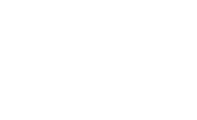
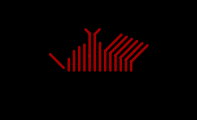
top track: none -> (85, 29) (89, 33) (89, 70)
top track: none -> (99, 29) (94, 34) (94, 70)
top track: none -> (121, 34) (105, 50) (105, 70)
top track: none -> (126, 36) (110, 53) (110, 70)
top track: none -> (131, 38) (115, 55) (115, 70)
top track: none -> (137, 41) (120, 57) (120, 70)
top track: none -> (99, 42) (99, 70)
top track: none -> (142, 43) (125, 59) (125, 70)
top track: none -> (84, 44) (84, 70)
top track: none -> (147, 45) (131, 61) (131, 70)
top track: none -> (79, 47) (79, 70)
top track: none -> (74, 51) (74, 70)
top track: none -> (50, 54) (63, 67)
top track: none -> (68, 59) (68, 70)

